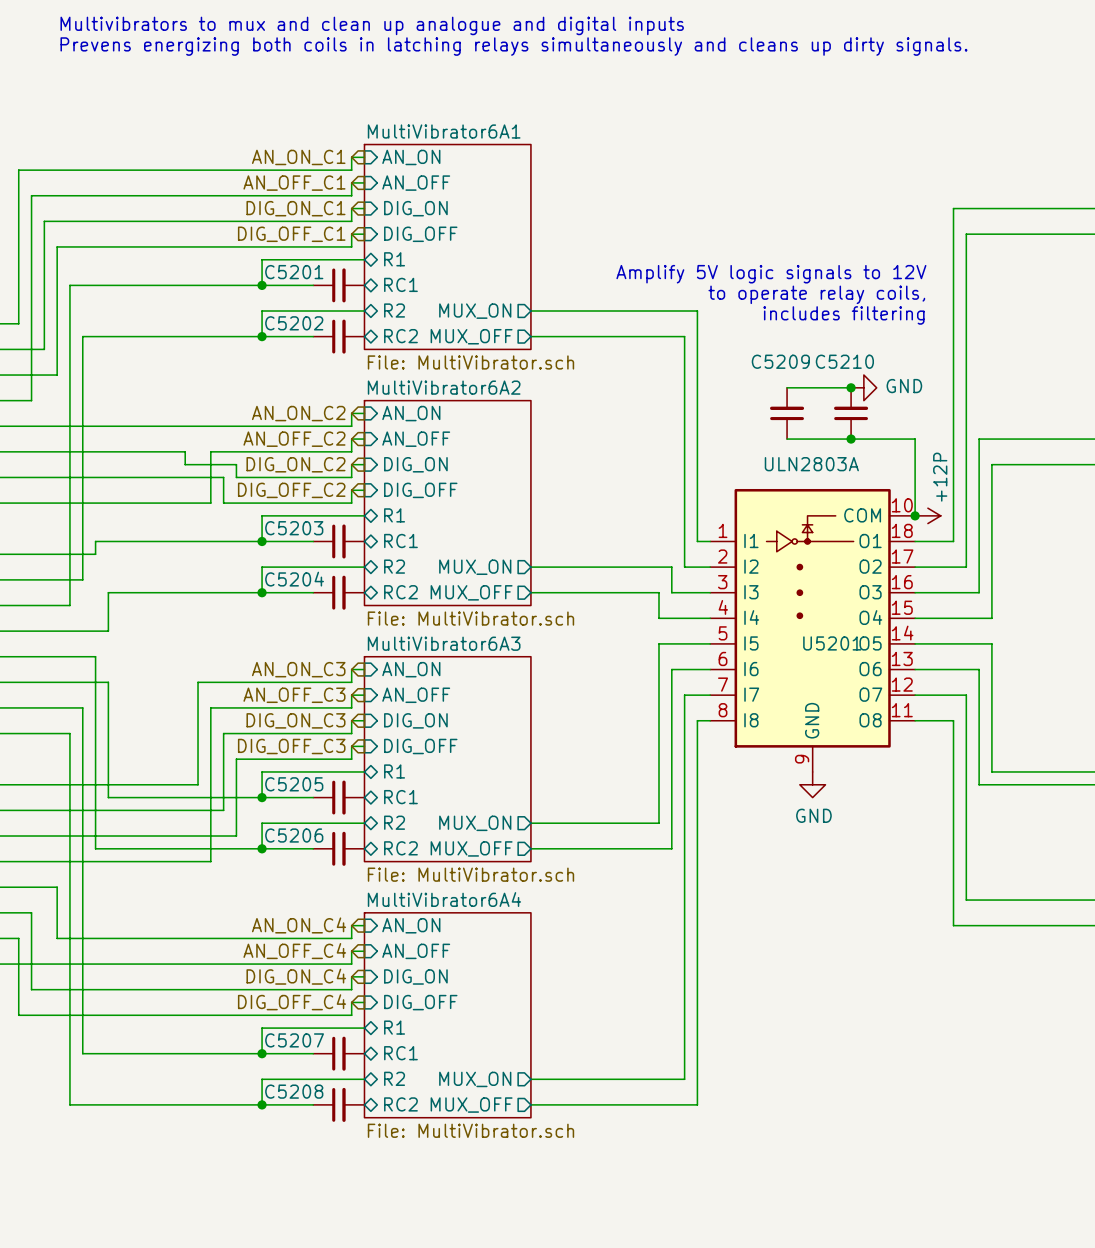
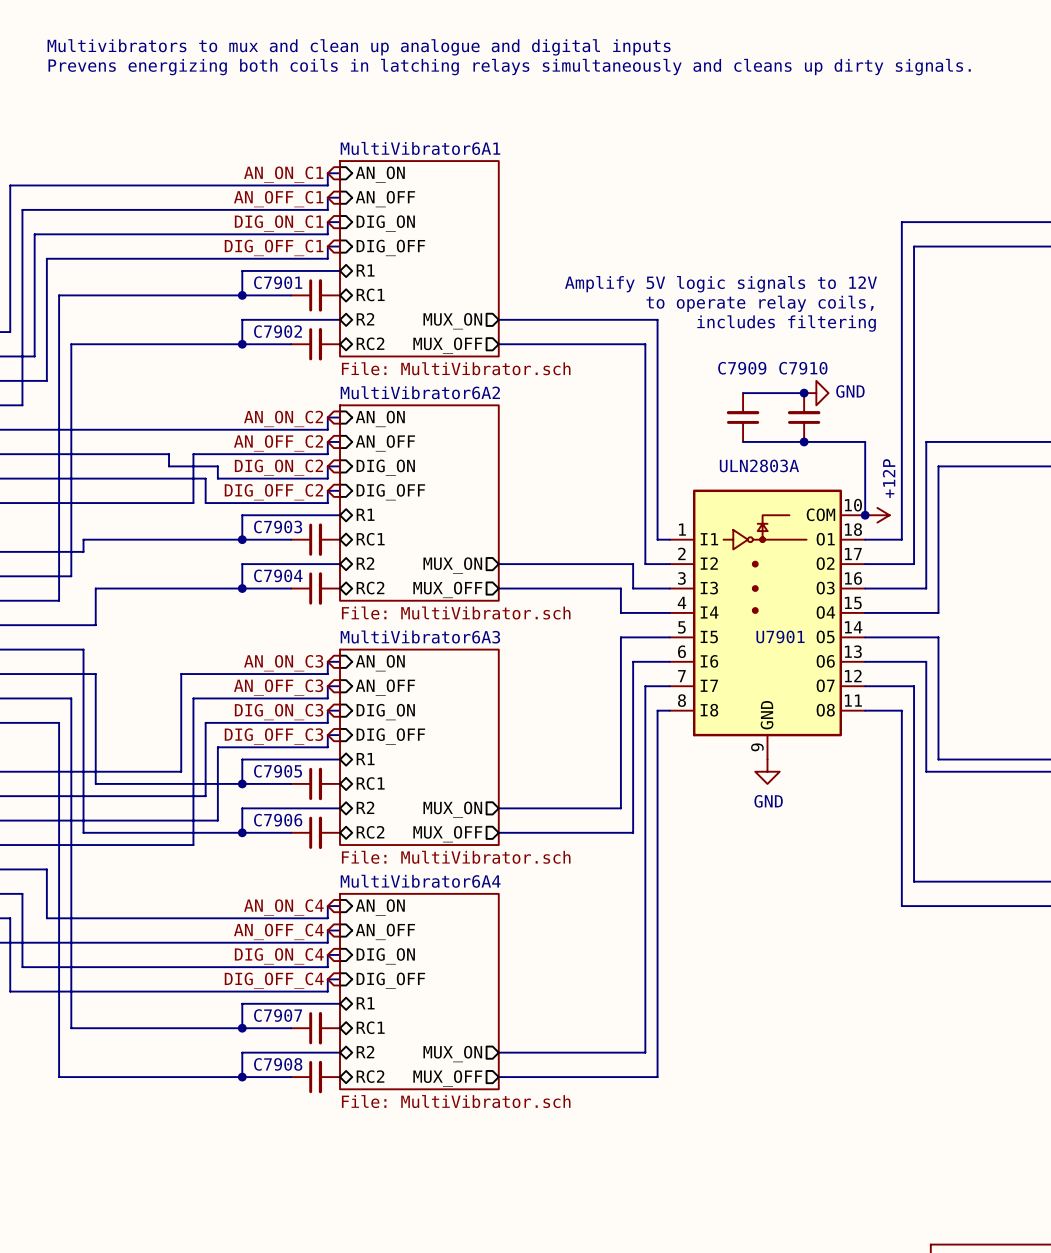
C5201 name: C5201 (294, 272) -> C7901 (278, 282)
C5202 name: C5202 (294, 323) -> C7902 (278, 331)
C5209 name: C5209 (780, 361) -> C7909 (742, 368)
C5210 name: C5210 (844, 361) -> C7910 (803, 368)
C5203 name: C5203 (294, 528) -> C7903 (278, 527)
C5204 name: C5204 (294, 579) -> C7904 (278, 575)
U5201 name: U5201 (832, 643) -> U7901 (780, 636)
C5205 name: C5205 (294, 784) -> C7905 (278, 771)
C5206 name: C5206 (294, 835) -> C7906 (278, 820)
C5207 name: C5207 (294, 1040) -> C7907 (278, 1015)
C5208 name: C5208 (294, 1091) -> C7908 (278, 1064)

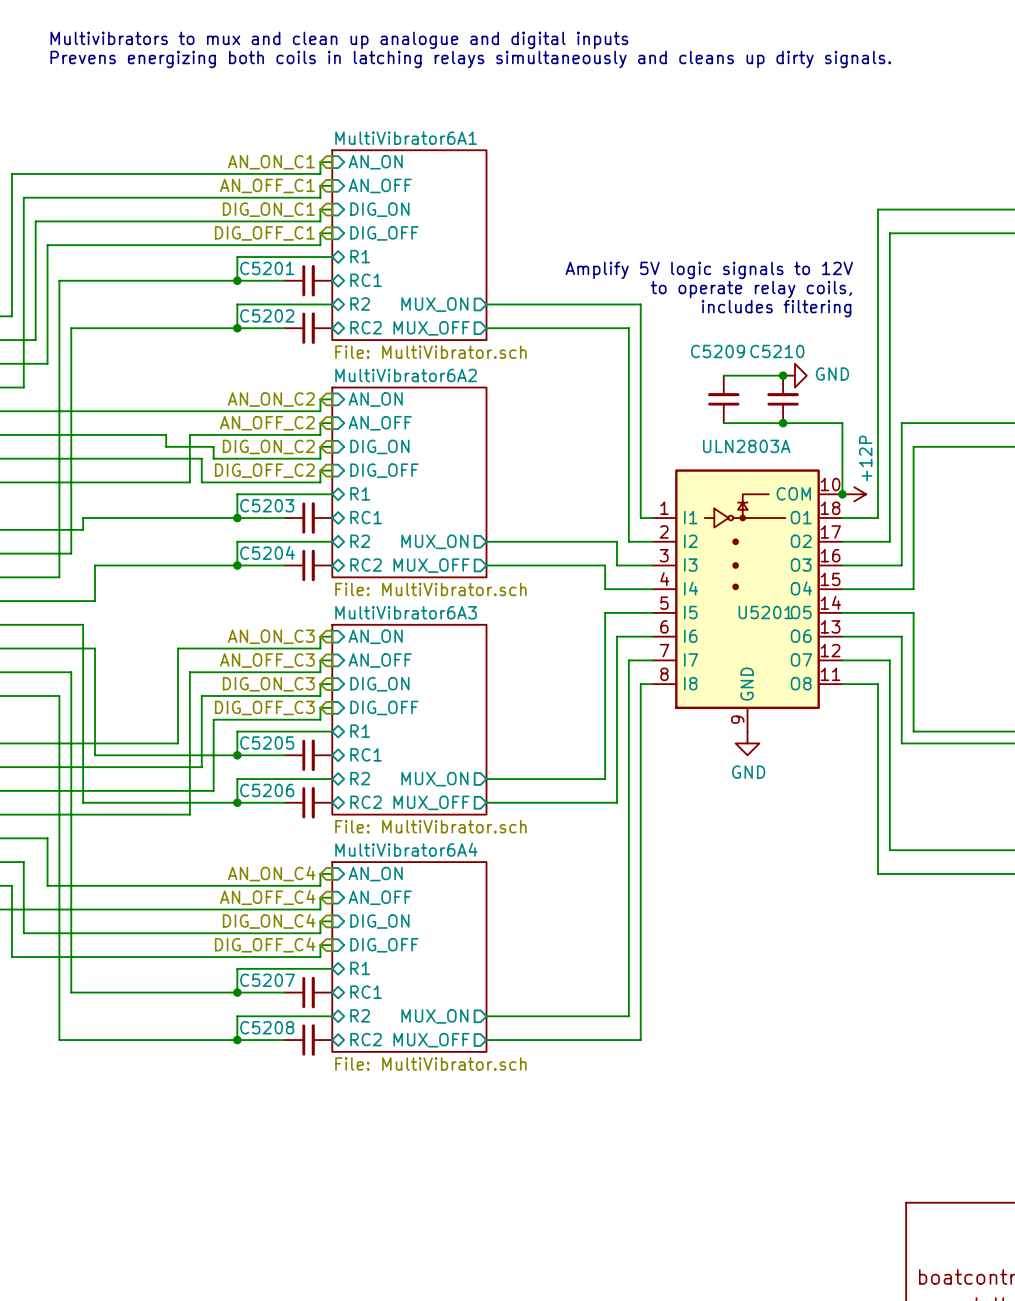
C7901 name: C7901 (278, 282) -> C5201 (267, 268)
C7902 name: C7902 (278, 331) -> C5202 (267, 315)
C7909 name: C7909 (742, 368) -> C5209 (718, 351)
C7910 name: C7910 (803, 368) -> C5210 (777, 351)
C7903 name: C7903 (278, 527) -> C5203 (267, 505)
C7904 name: C7904 (278, 575) -> C5204 (267, 552)
U7901 name: U7901 (780, 636) -> U5201 (765, 612)
C7905 name: C7905 (278, 771) -> C5205 (267, 742)
C7906 name: C7906 (278, 820) -> C5206 (267, 790)
C7907 name: C7907 (278, 1015) -> C5207 (267, 980)
C7908 name: C7908 (278, 1064) -> C5208 (267, 1027)

